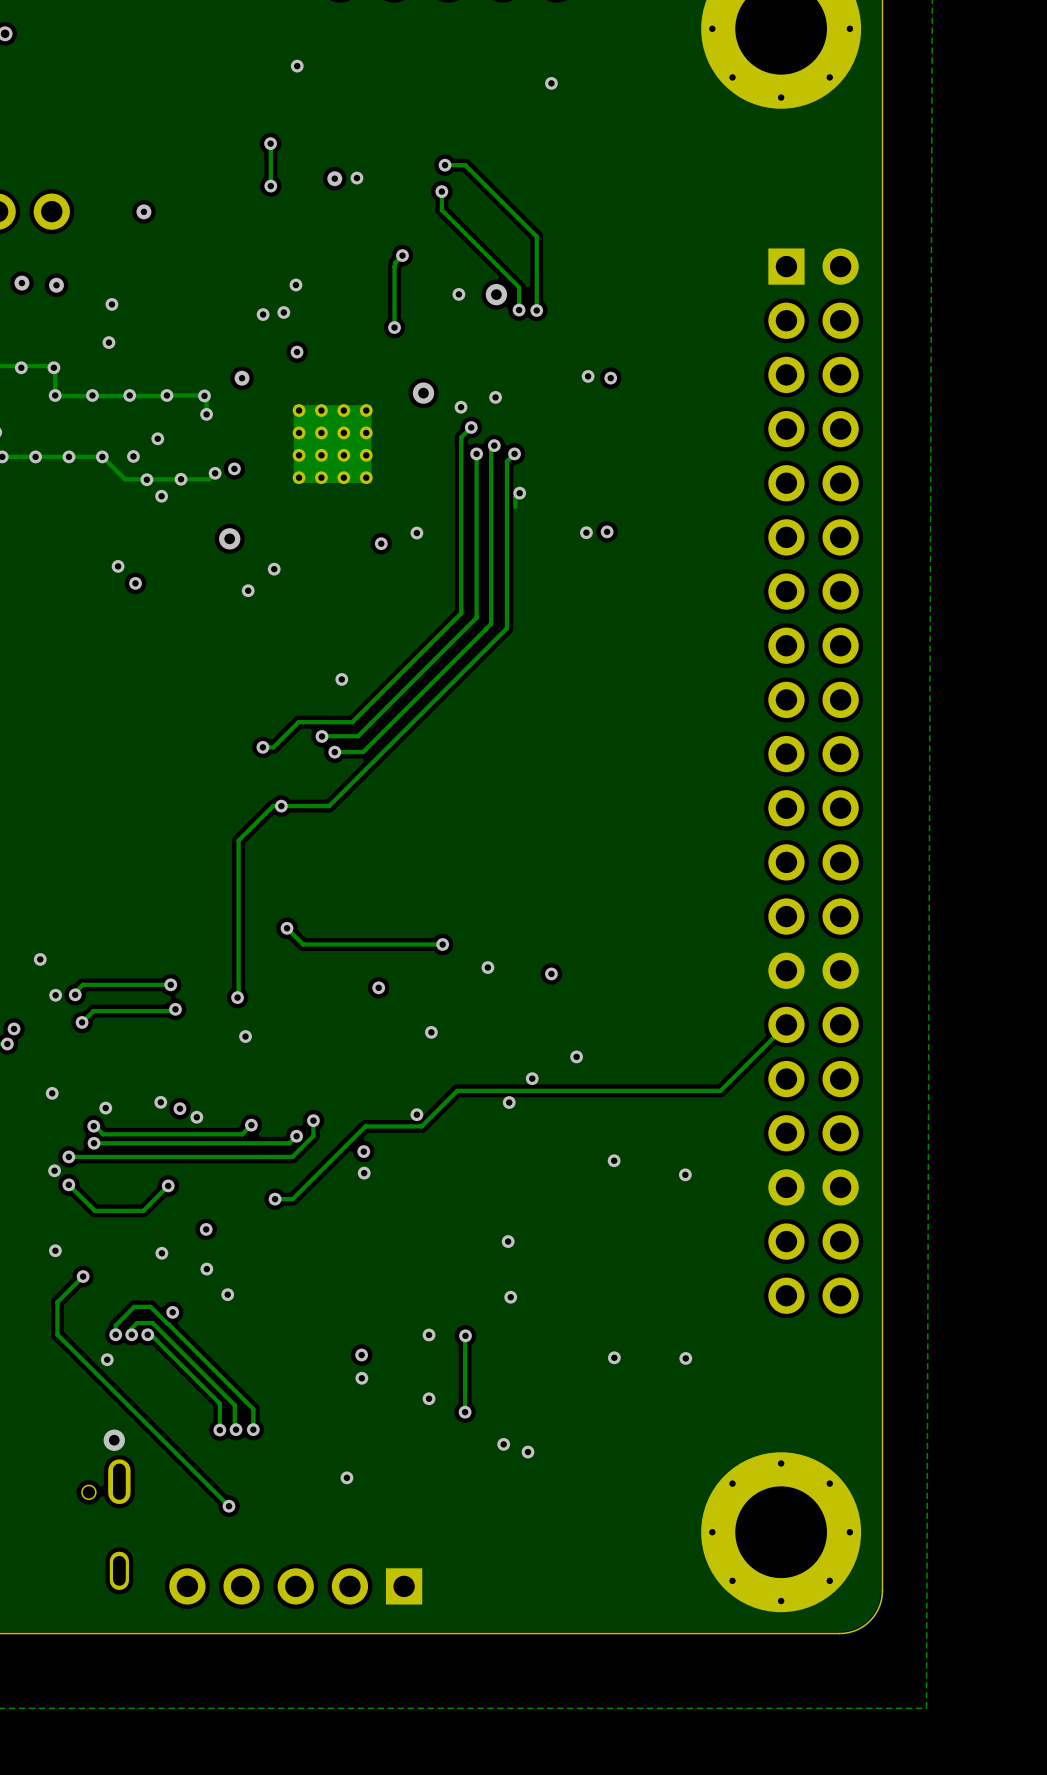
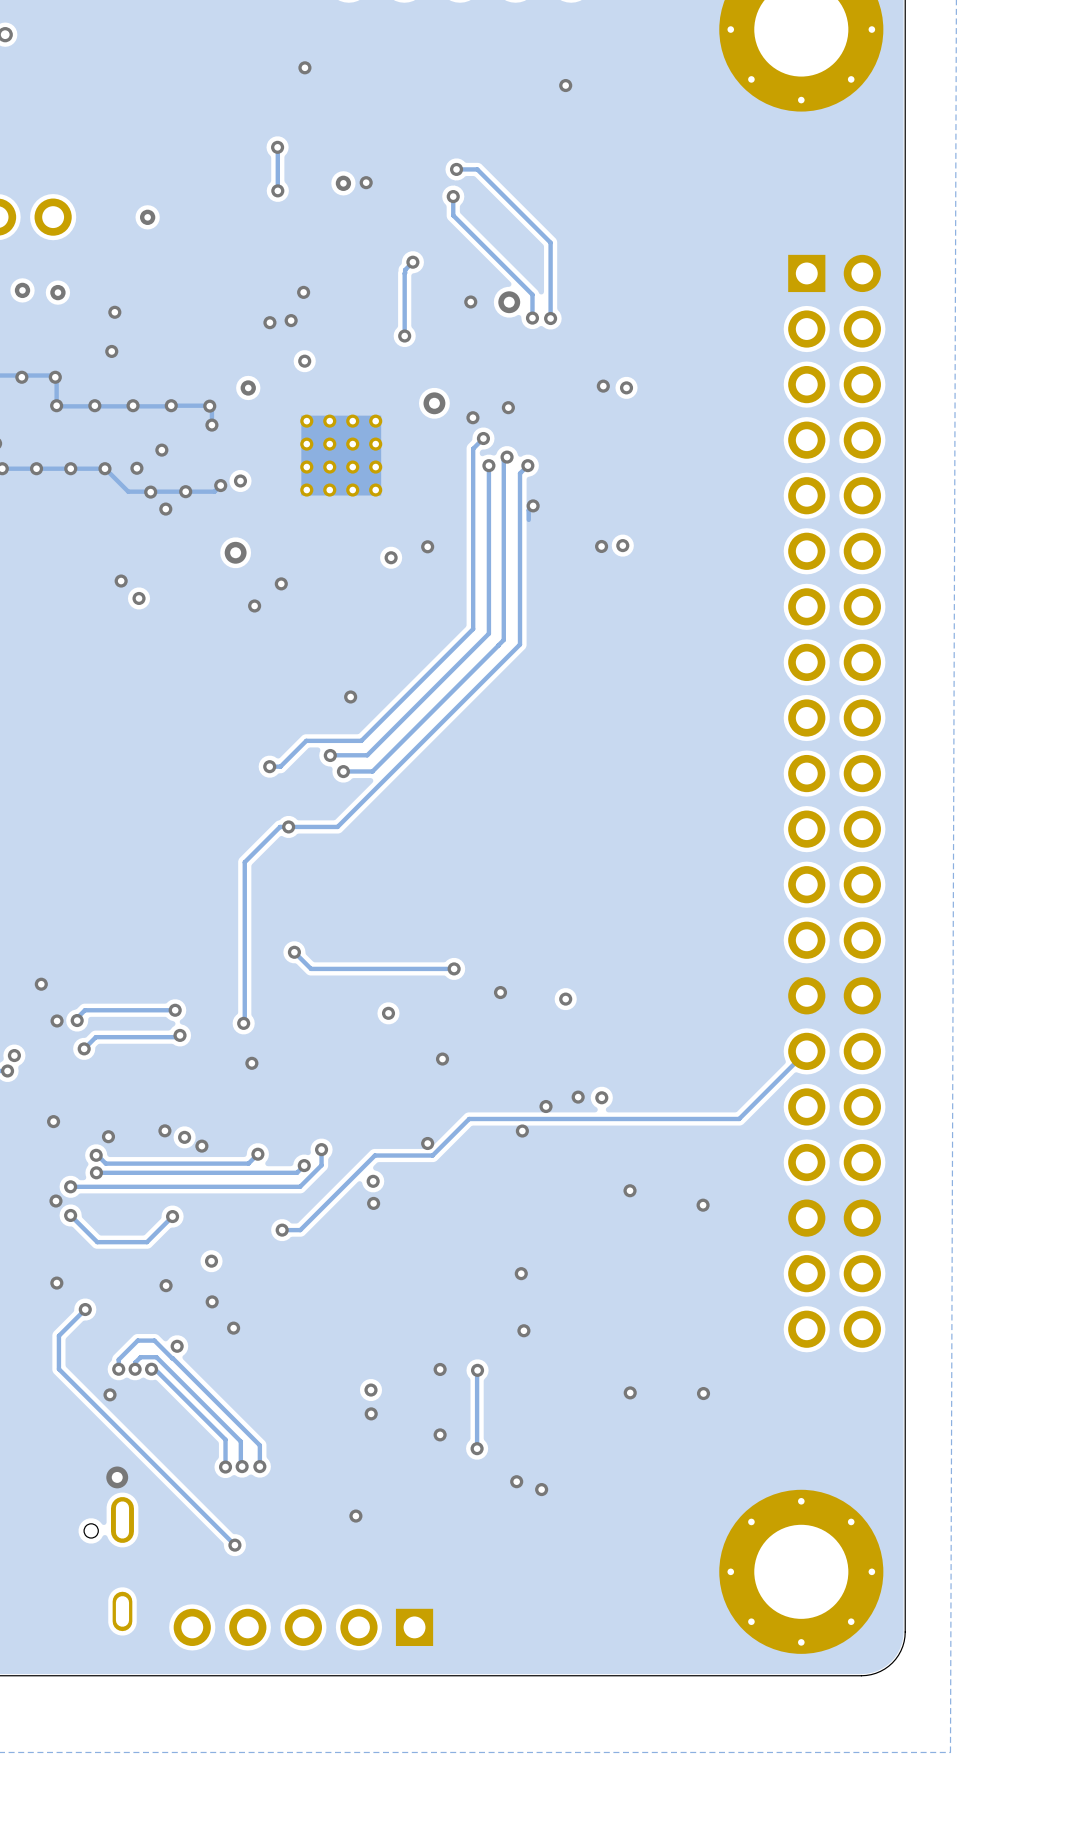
via: (576, 1056) -> none
via: none -> (578, 1097)
via: none -> (601, 1097)

